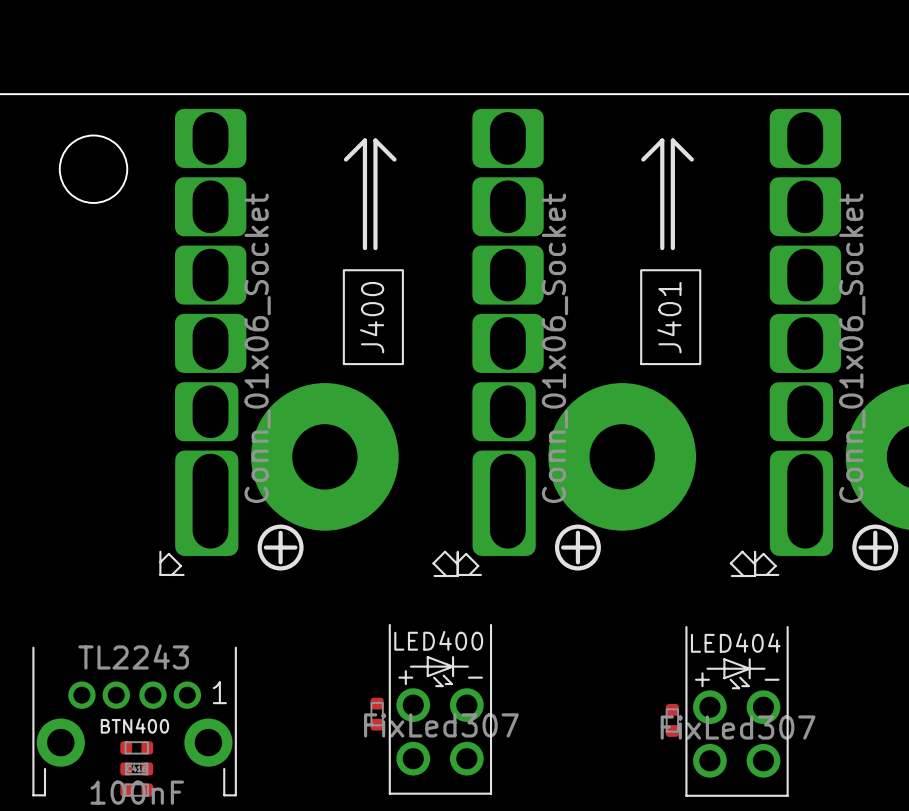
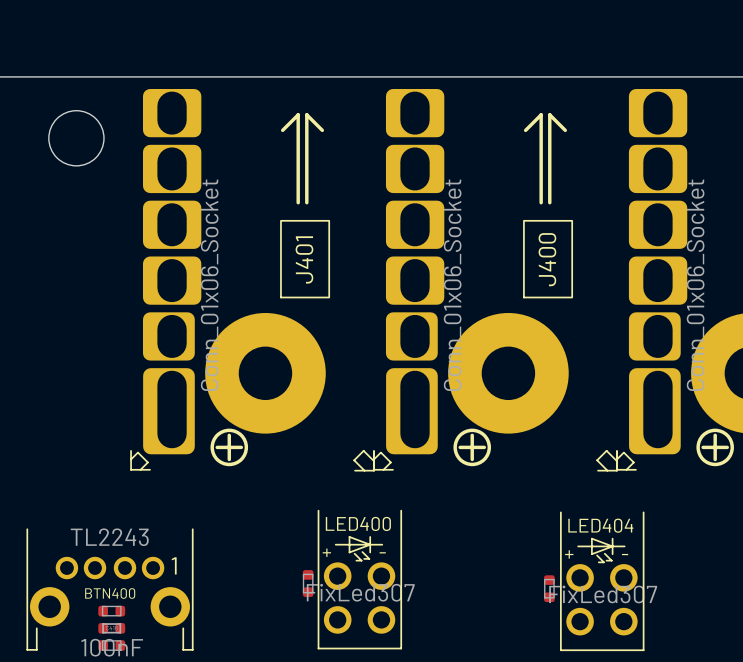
J400 name: J400 (372, 317) -> J401 (304, 259)
J401 name: J401 (669, 317) -> J400 (547, 259)

